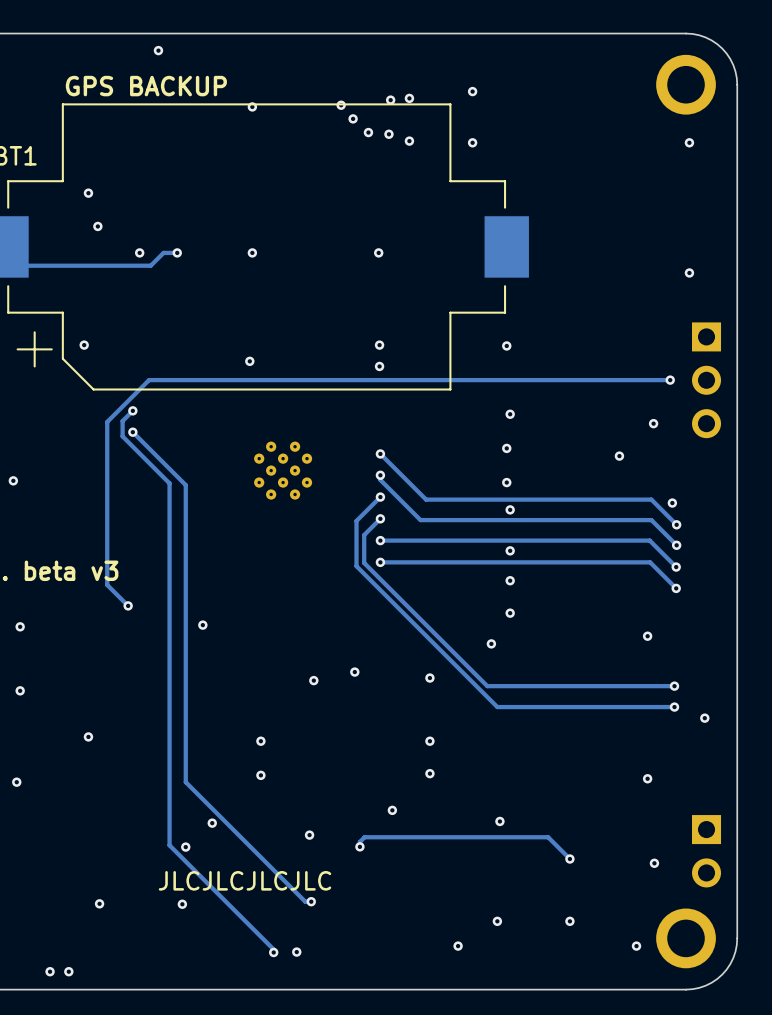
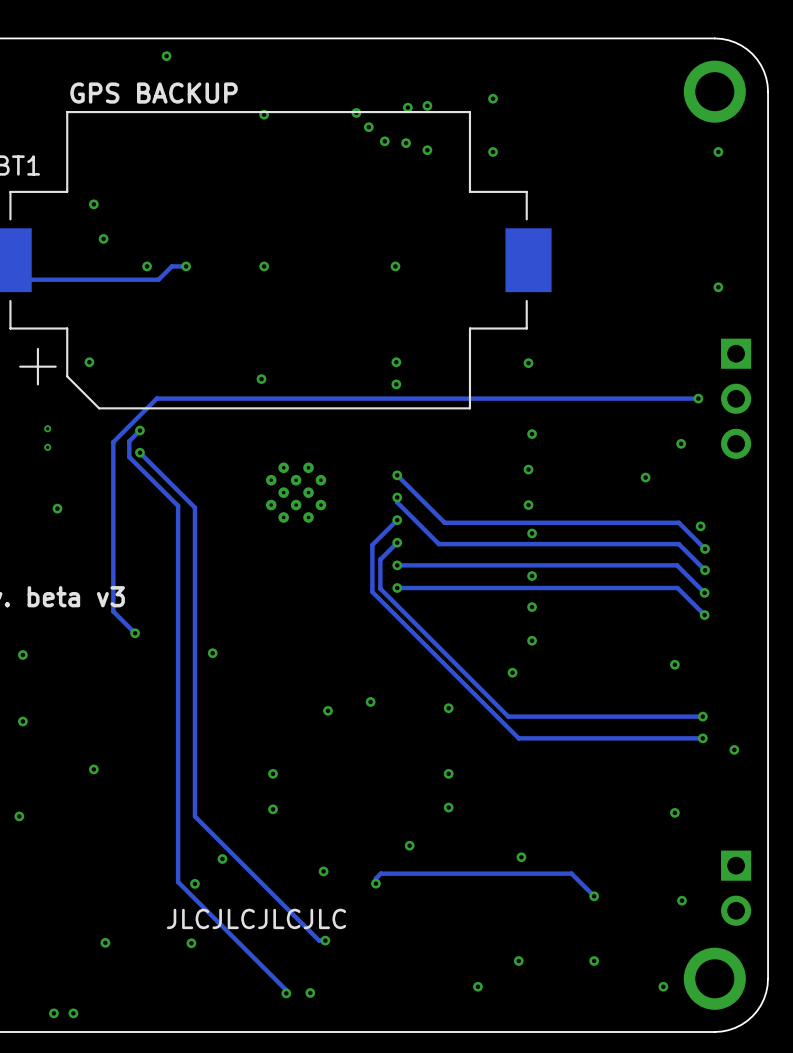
via: none -> (47, 428)
via: none -> (47, 447)
via position: (13, 480) -> (57, 508)

